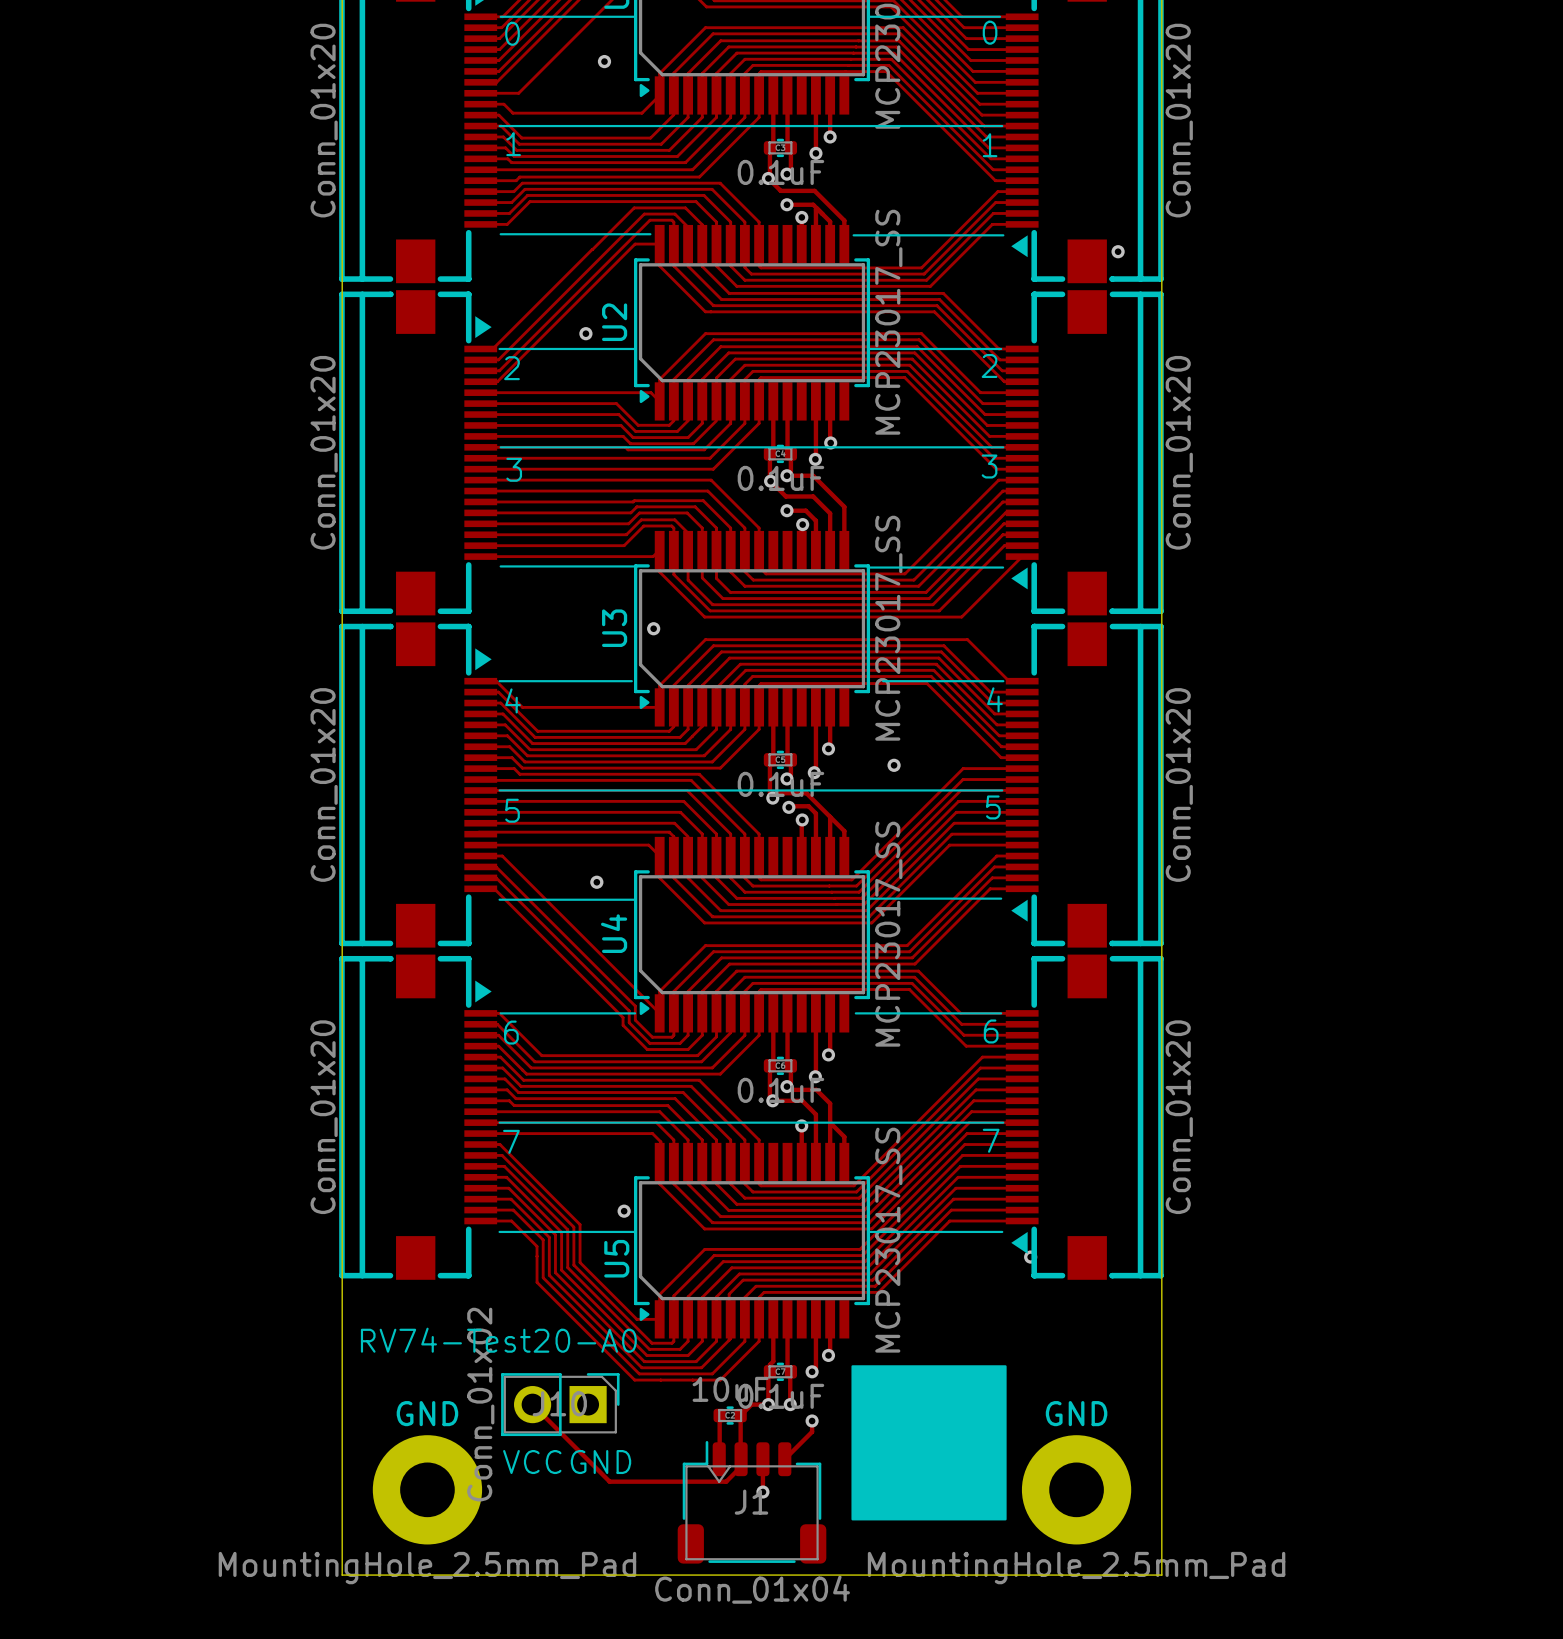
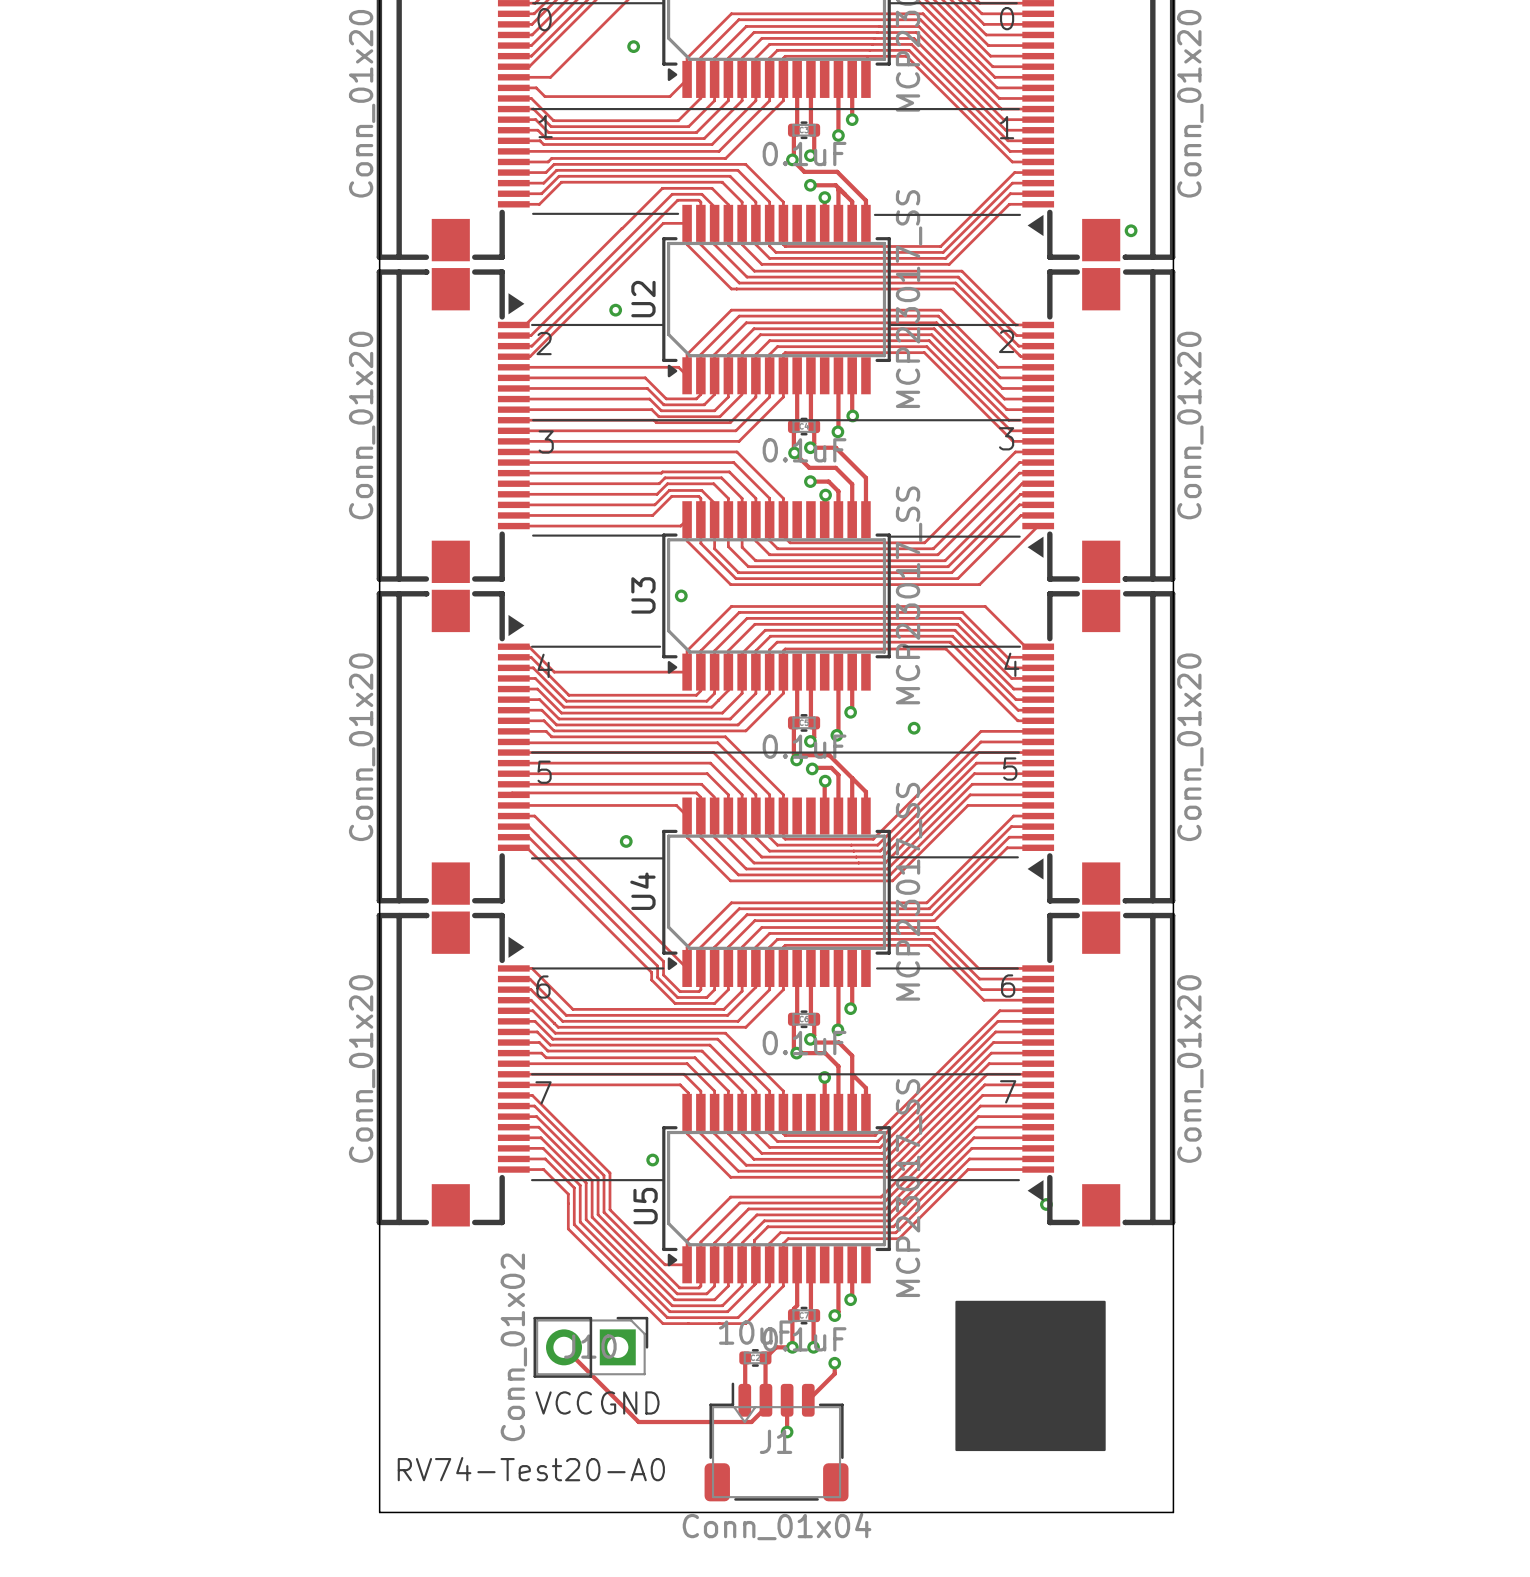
text position: RV74-Test20-A0 (498, 1340) -> RV74-Test20-A0 (531, 1469)
drawing position: (929, 1442) -> (1030, 1375)
GND: MountingHole_2.5mm_Pad (427, 1489) -> none
GND: MountingHole_2.5mm_Pad (1076, 1489) -> none

